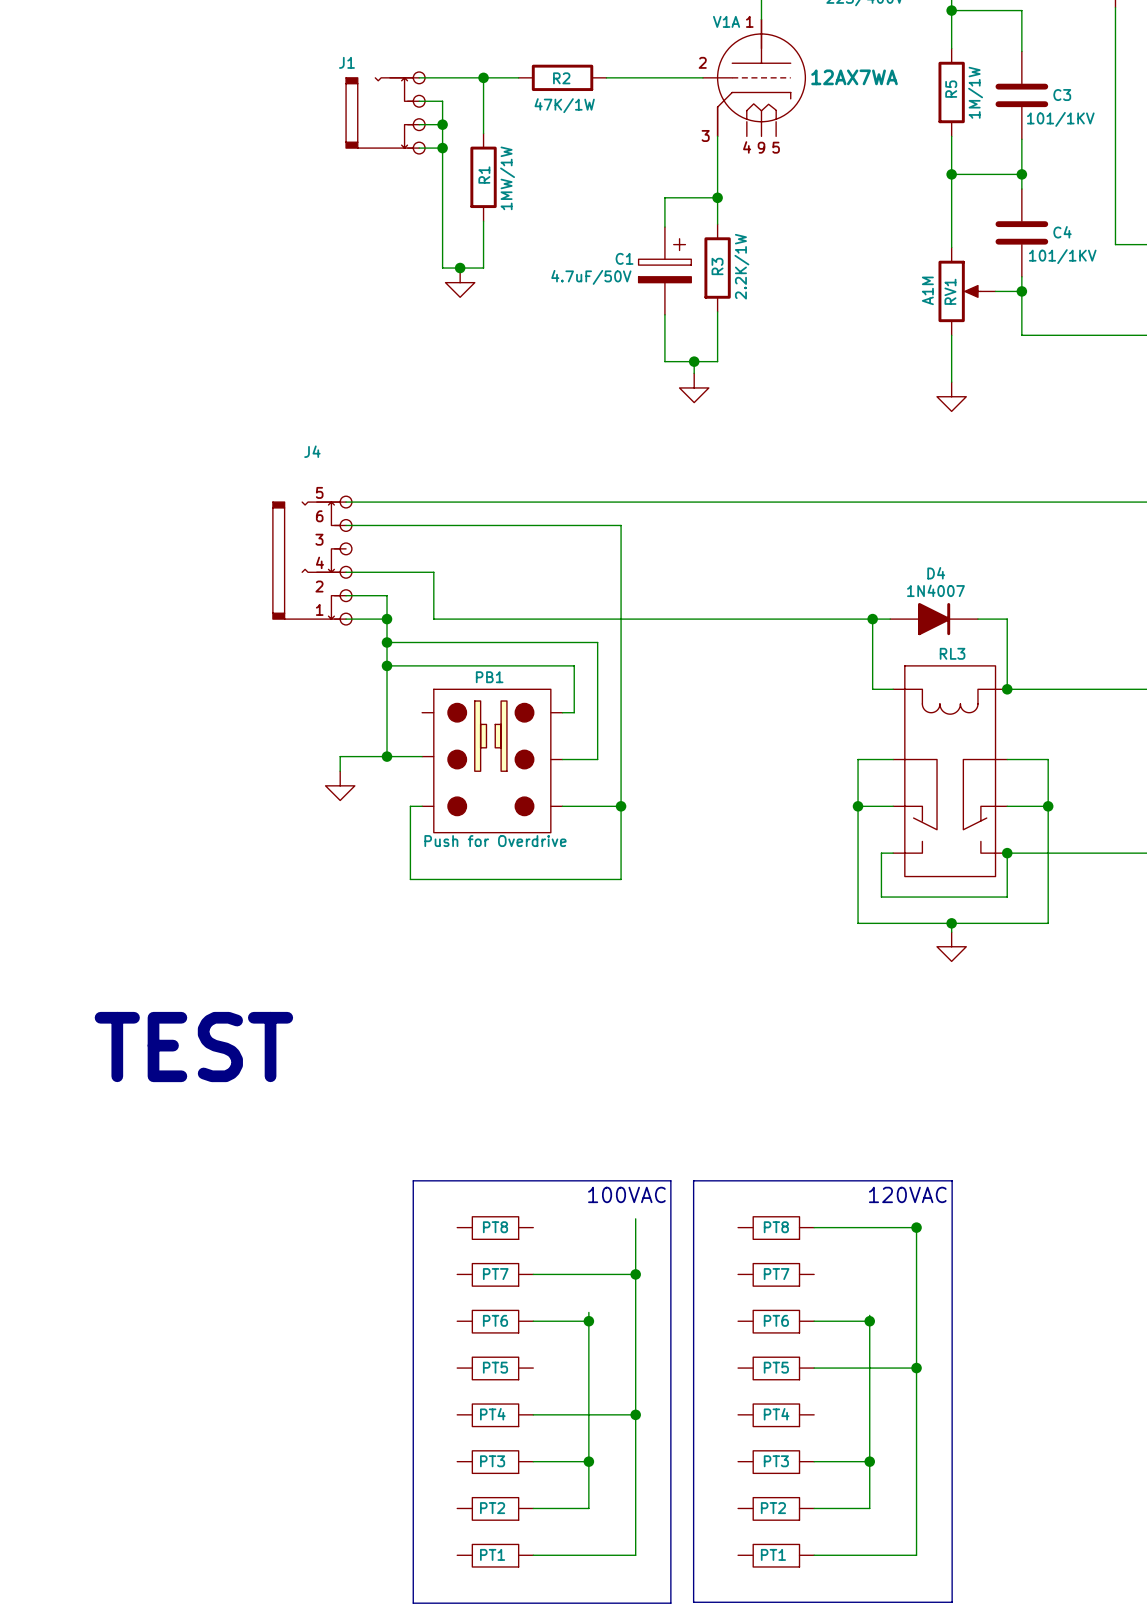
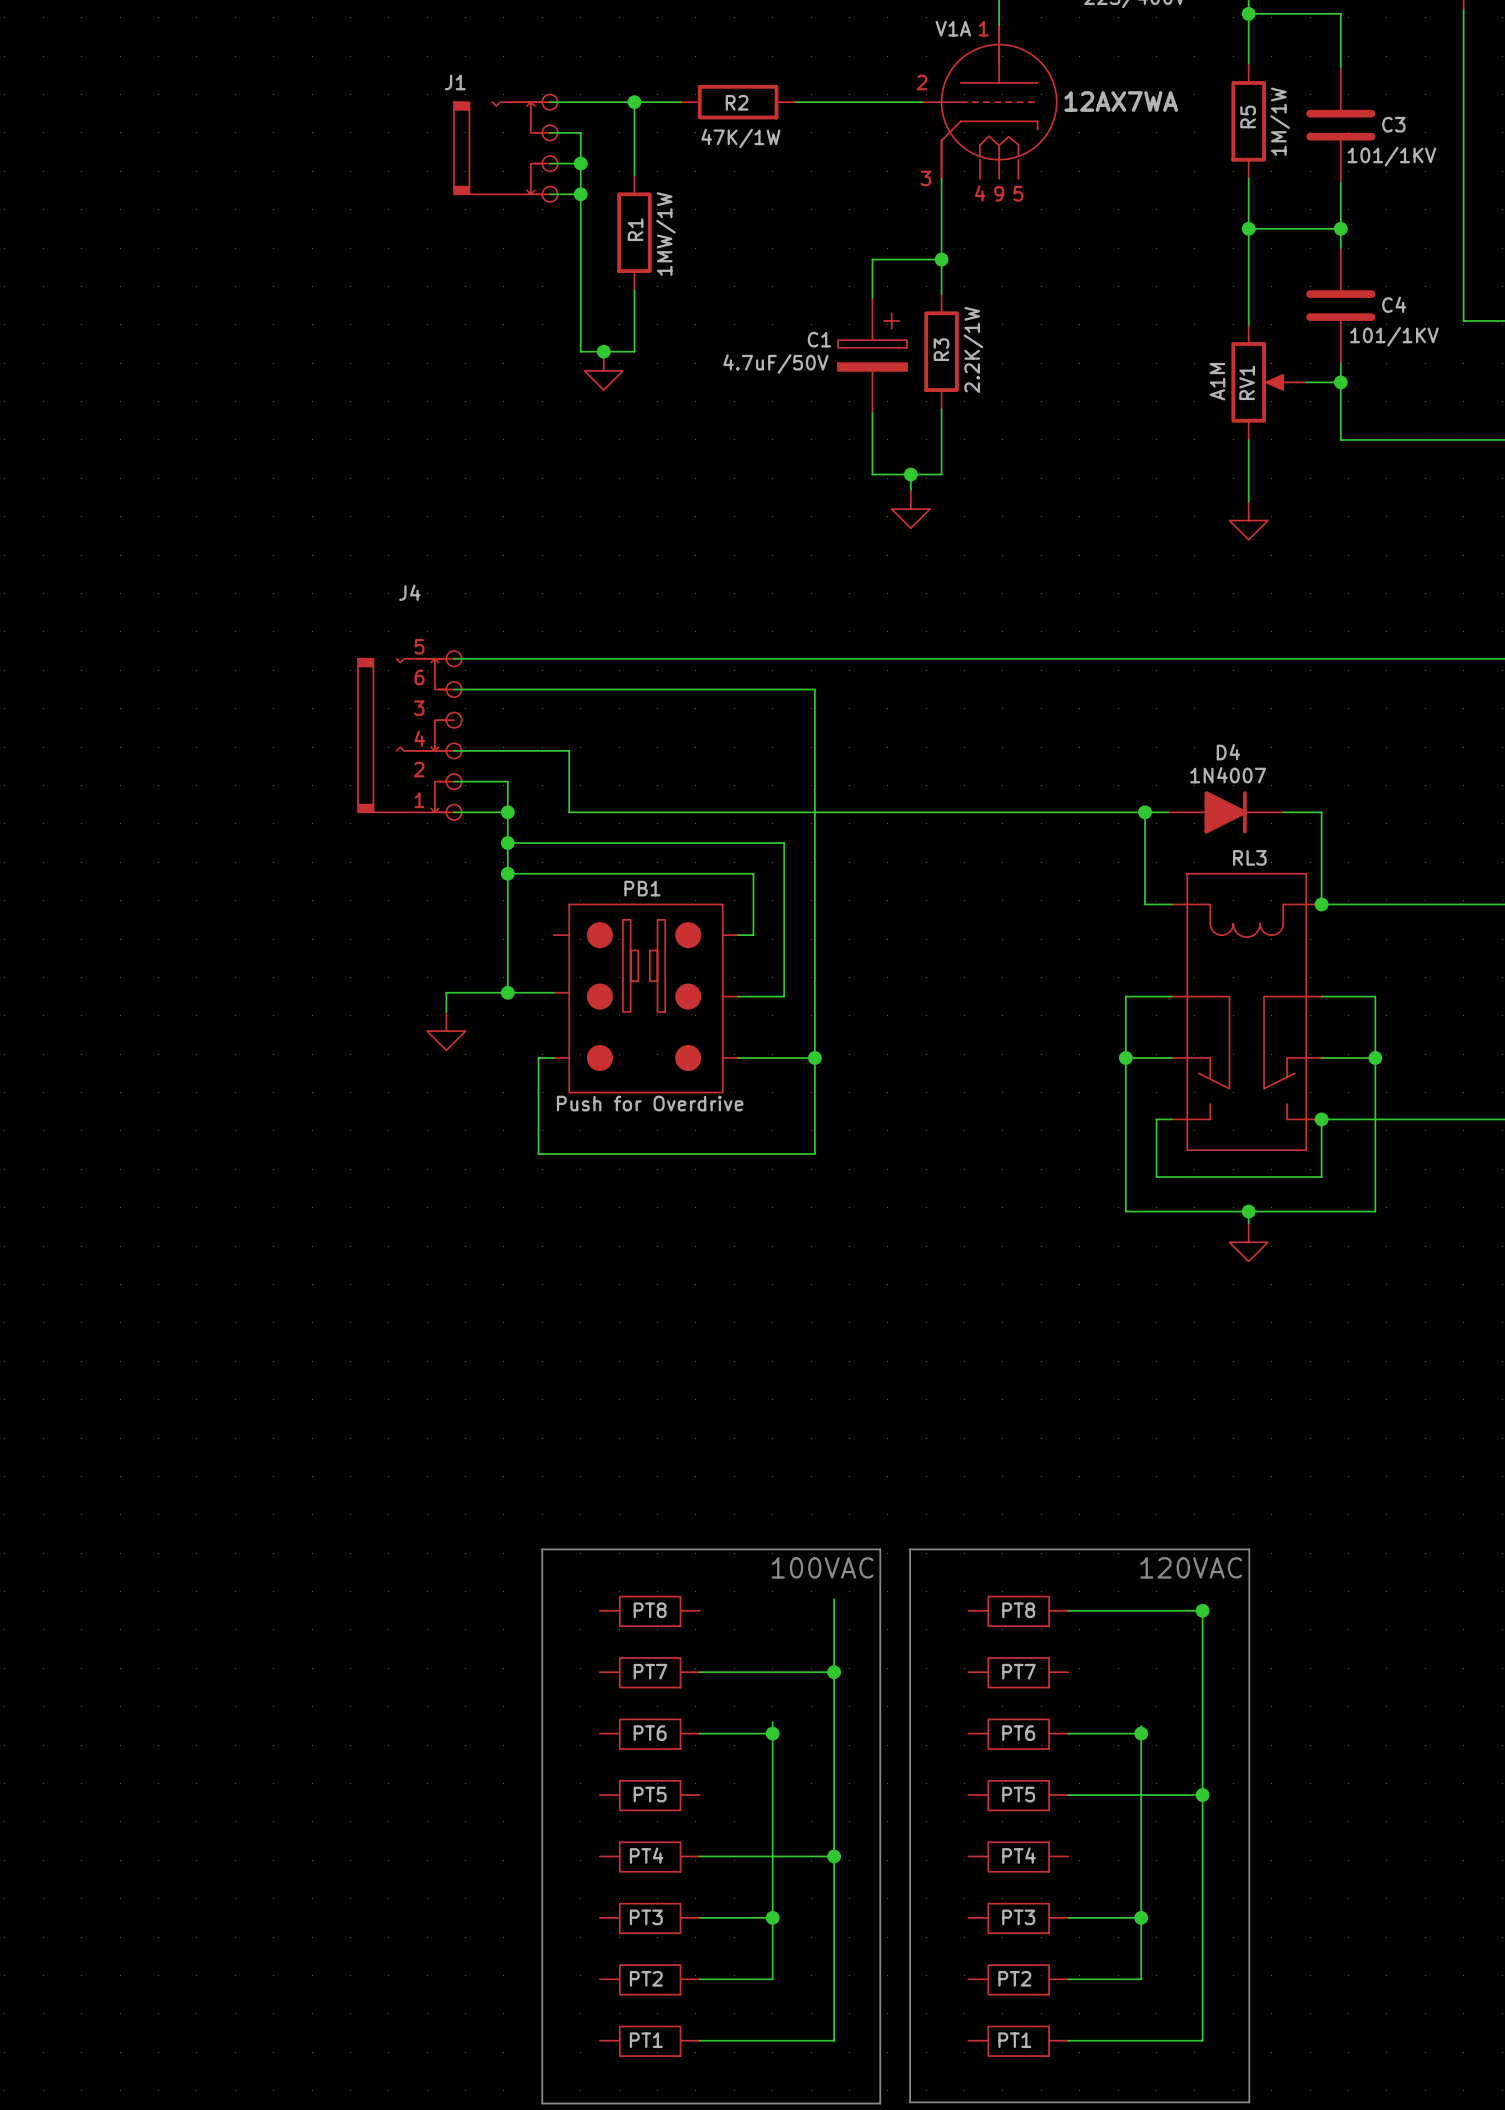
text: TEST (193, 1047) -> none

